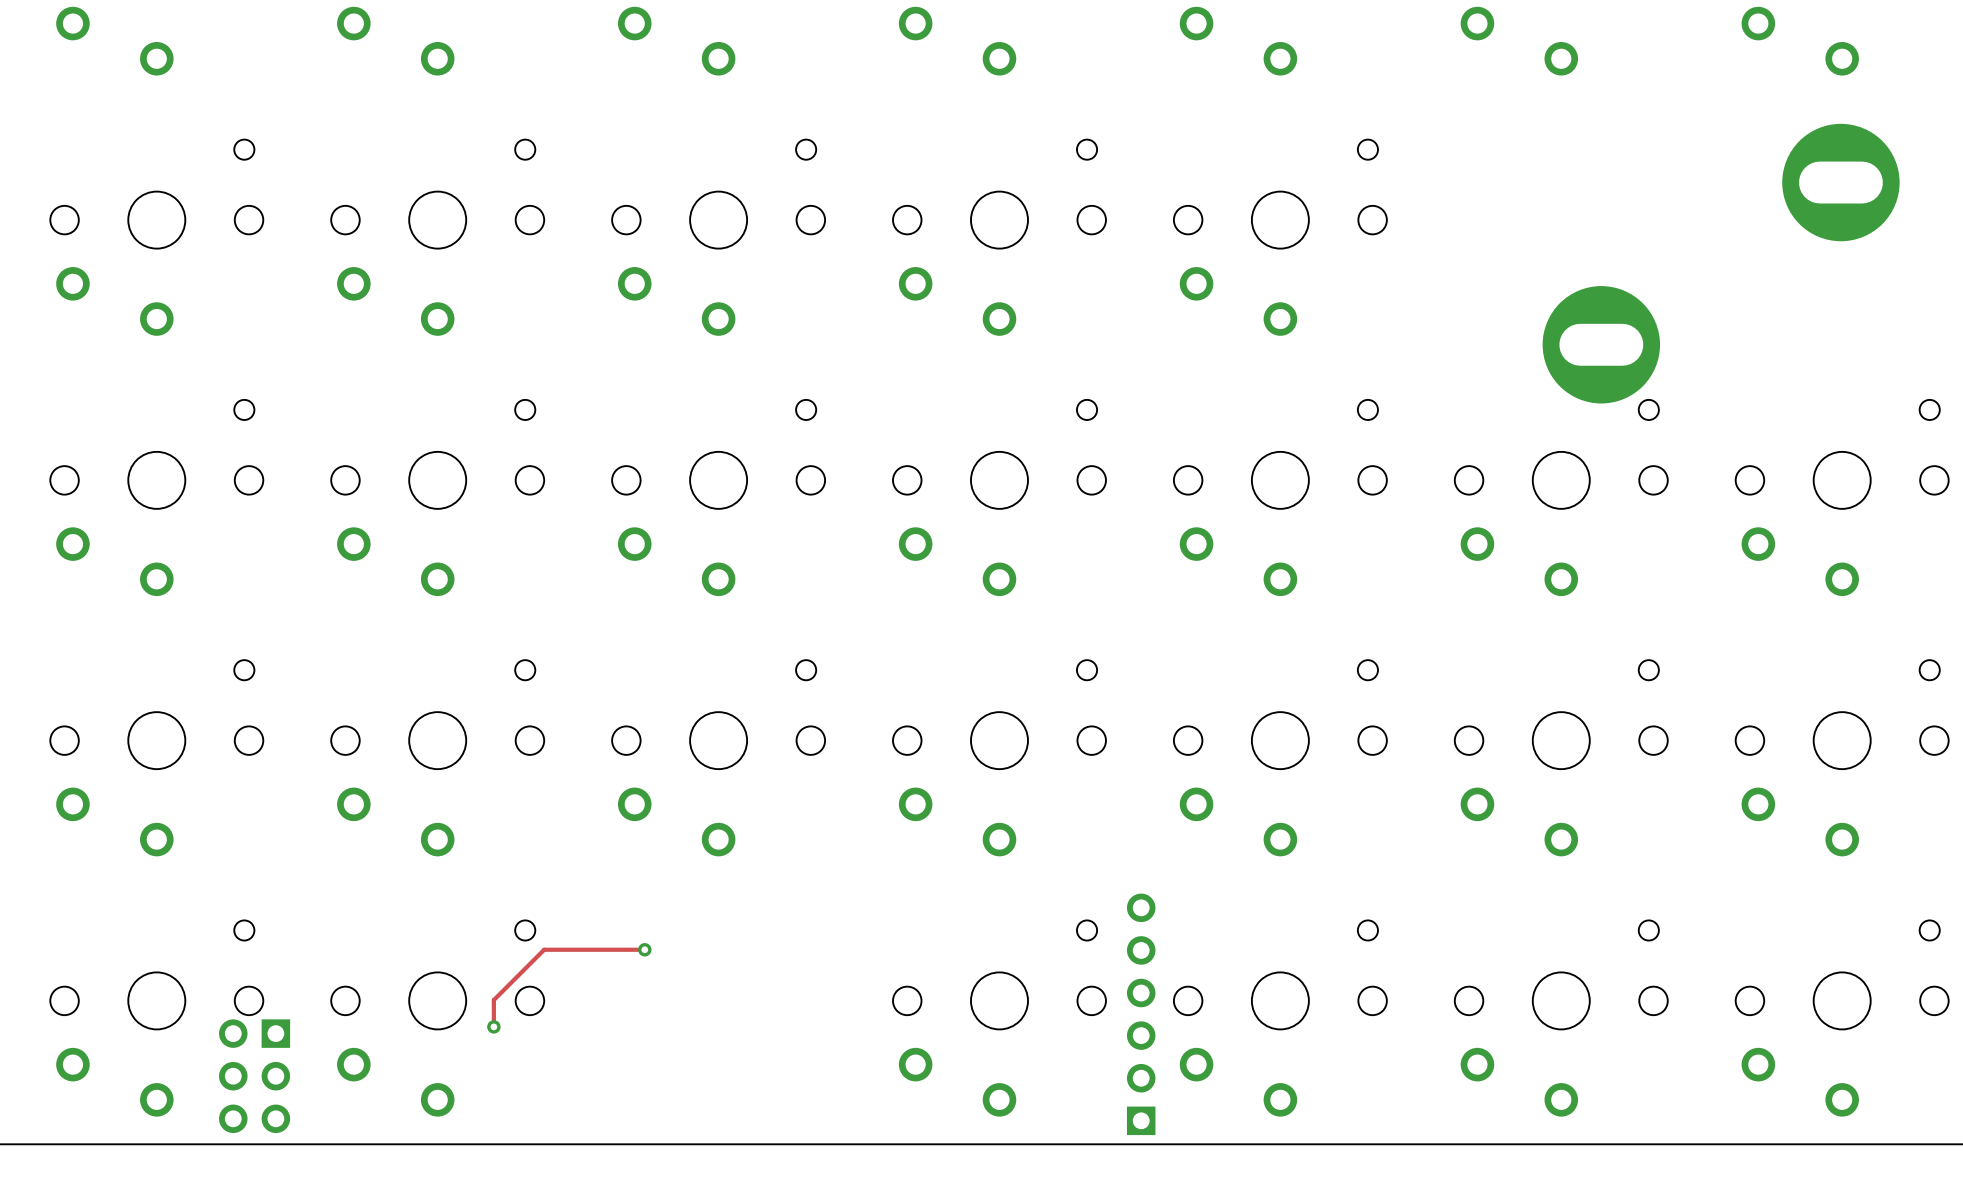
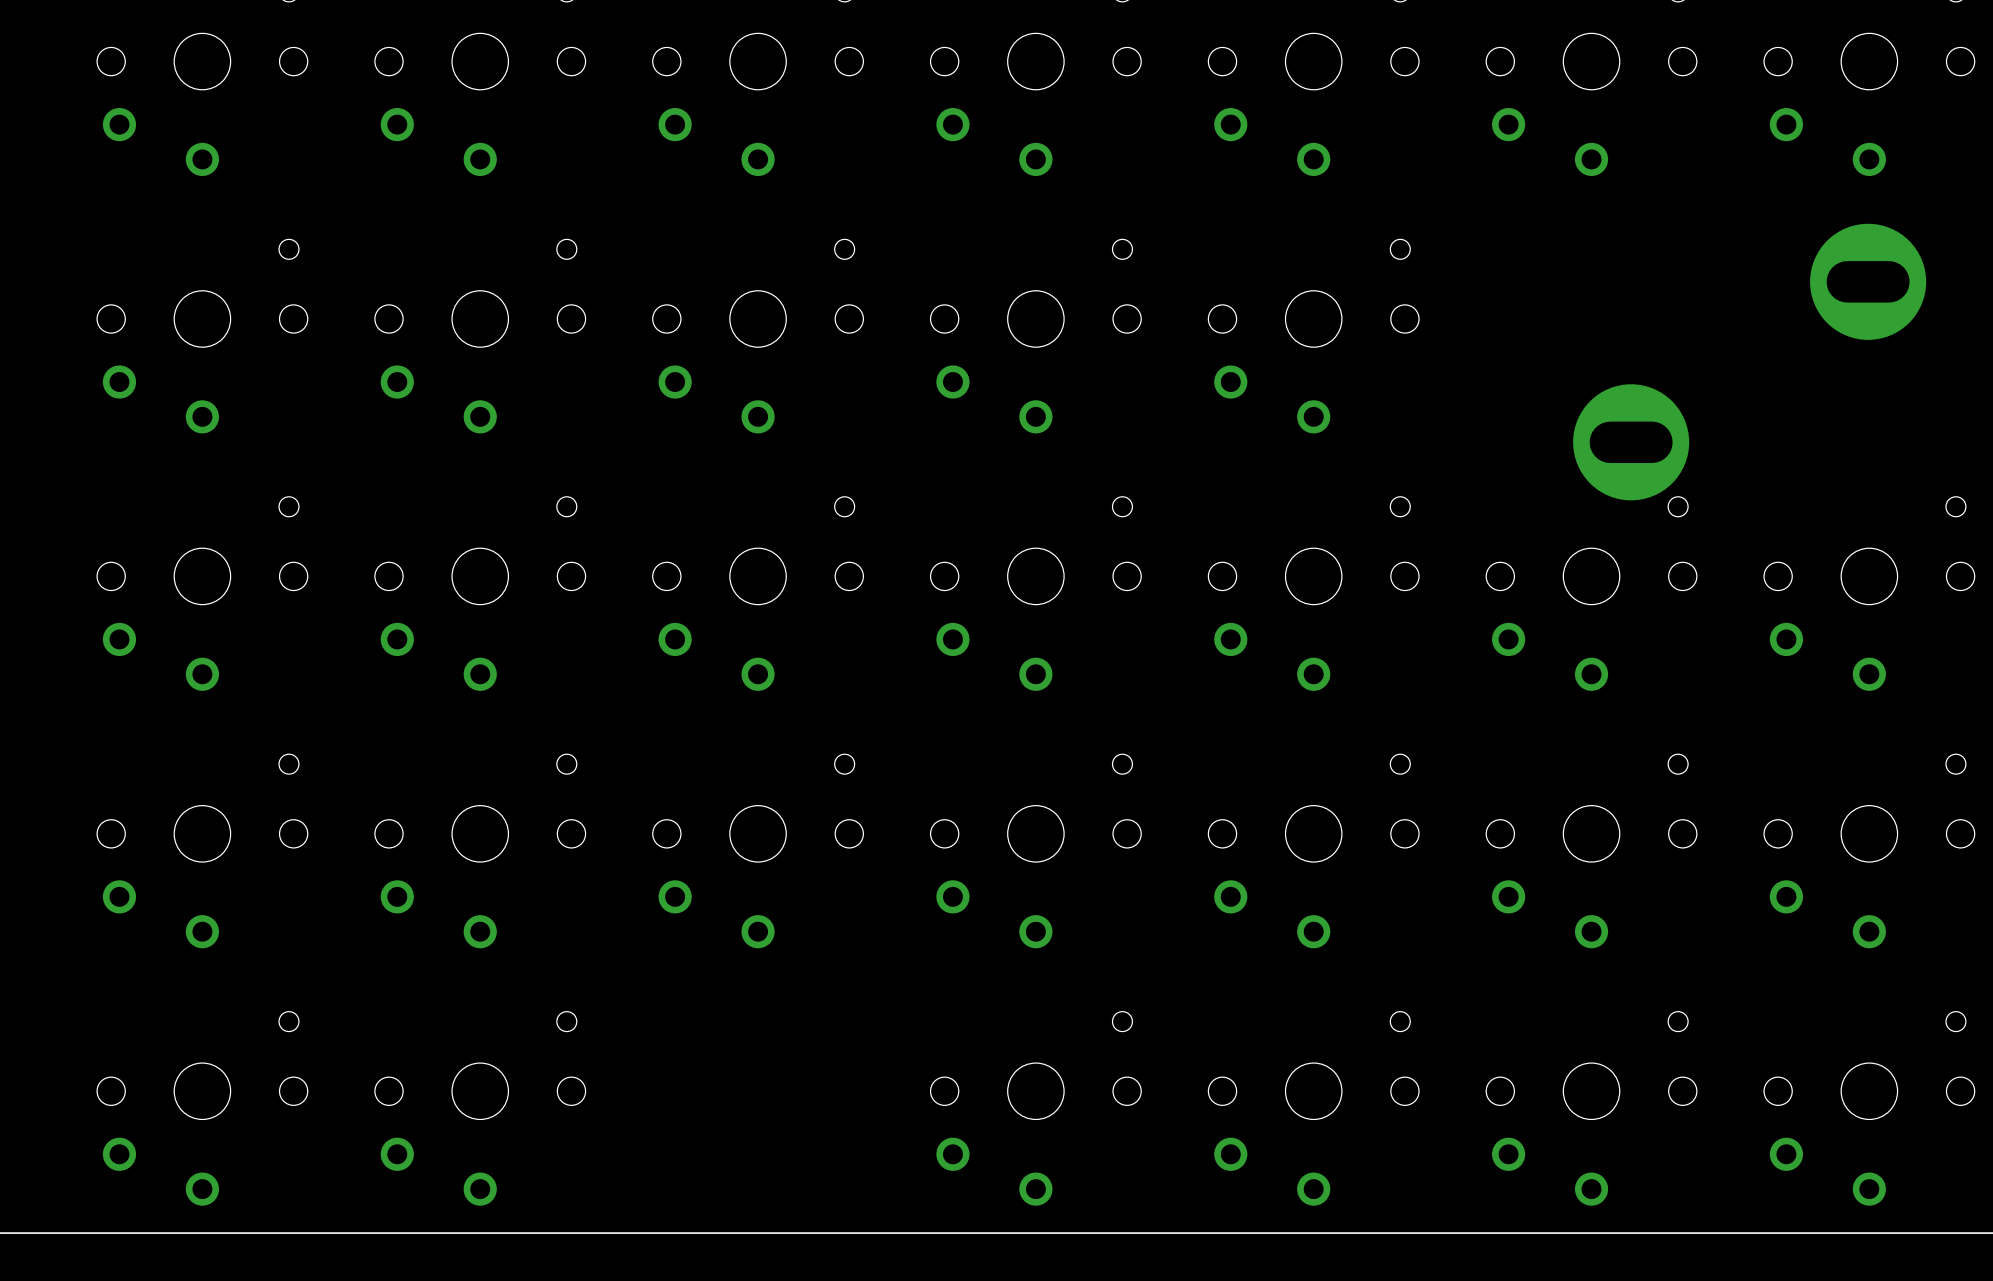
track: (644, 949) (544, 949) (493, 1000) (493, 1026) -> none
via: (644, 949) -> none
part: (1141, 1014) -> none
via: (493, 1026) -> none
part: (254, 1076) -> none

